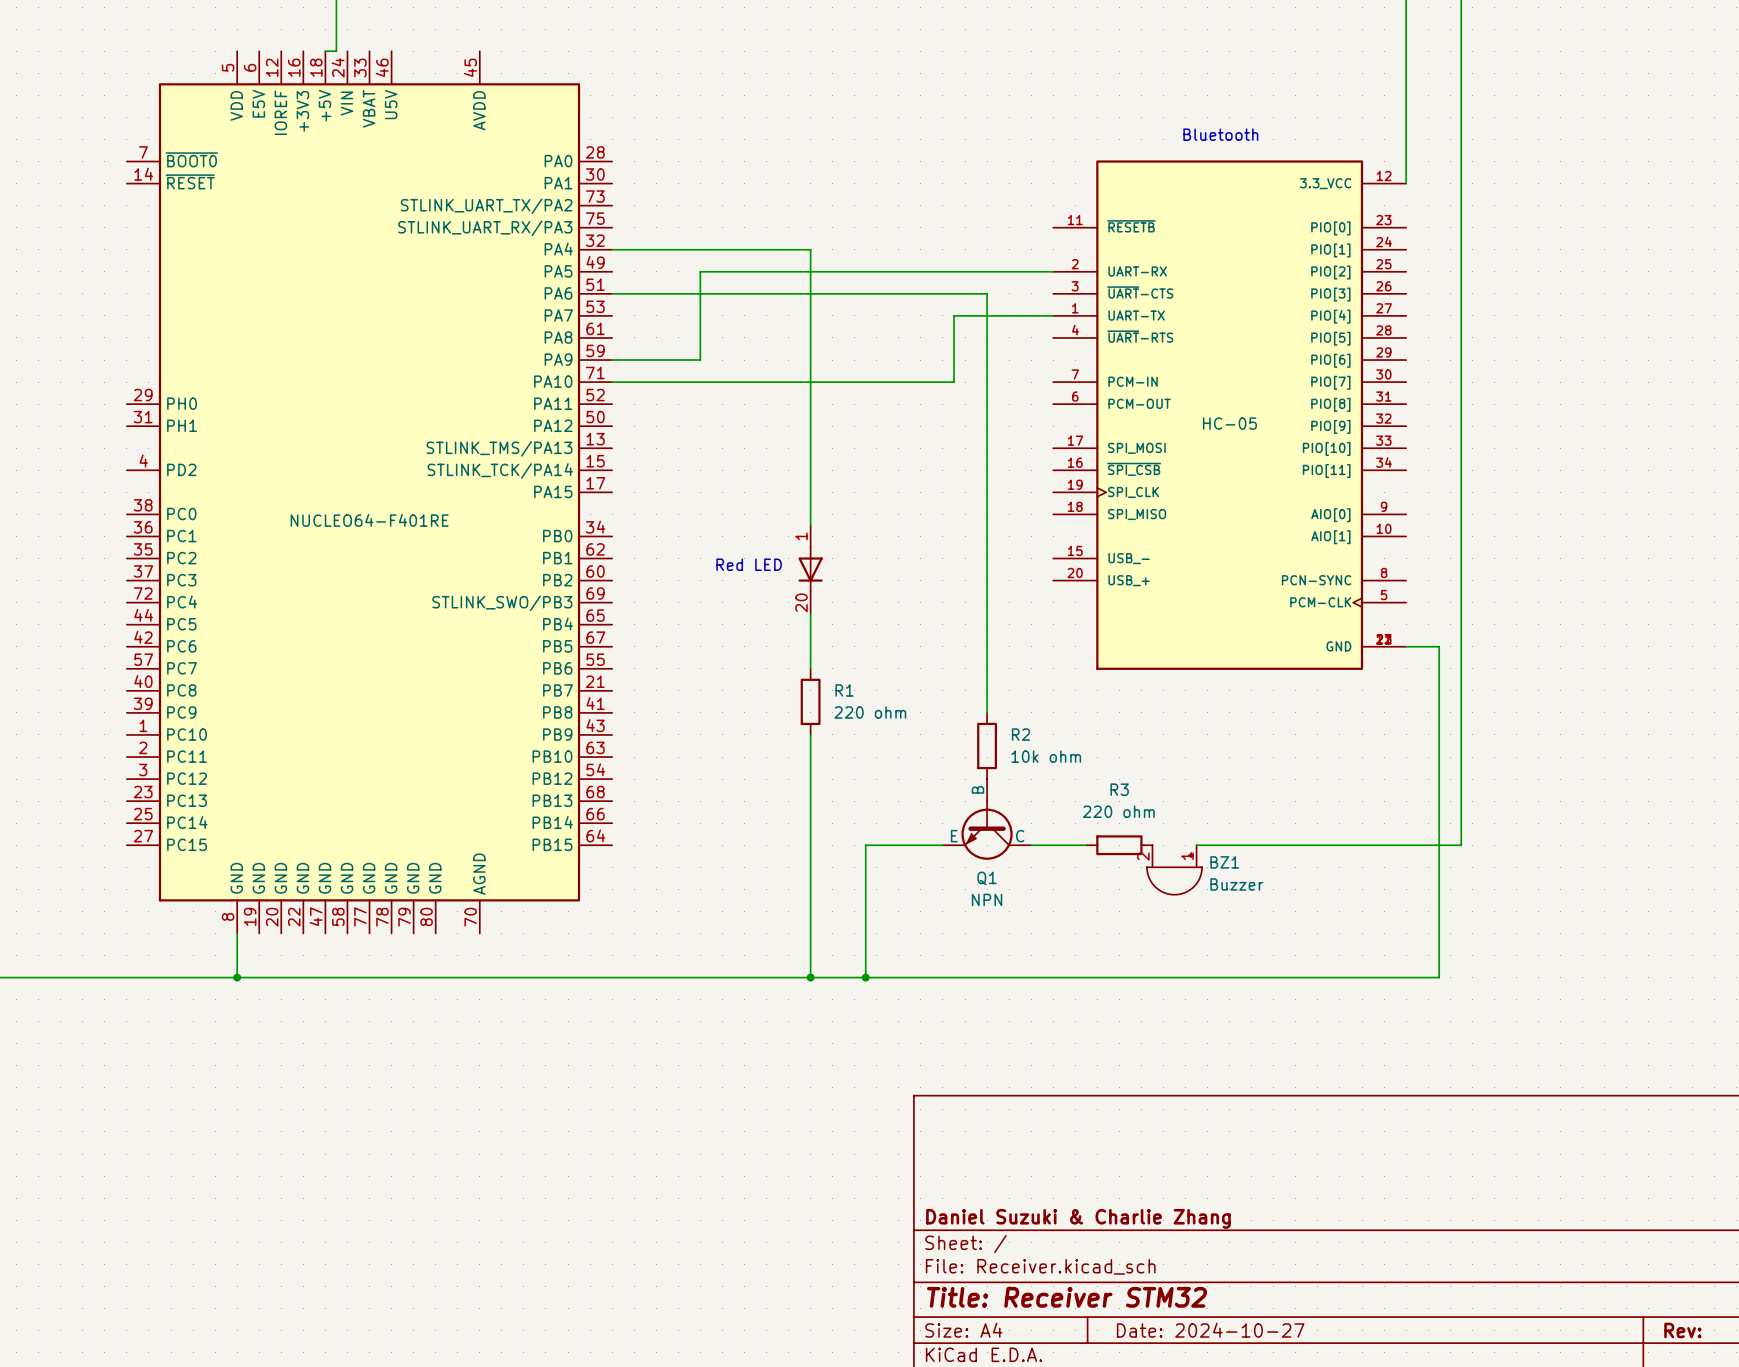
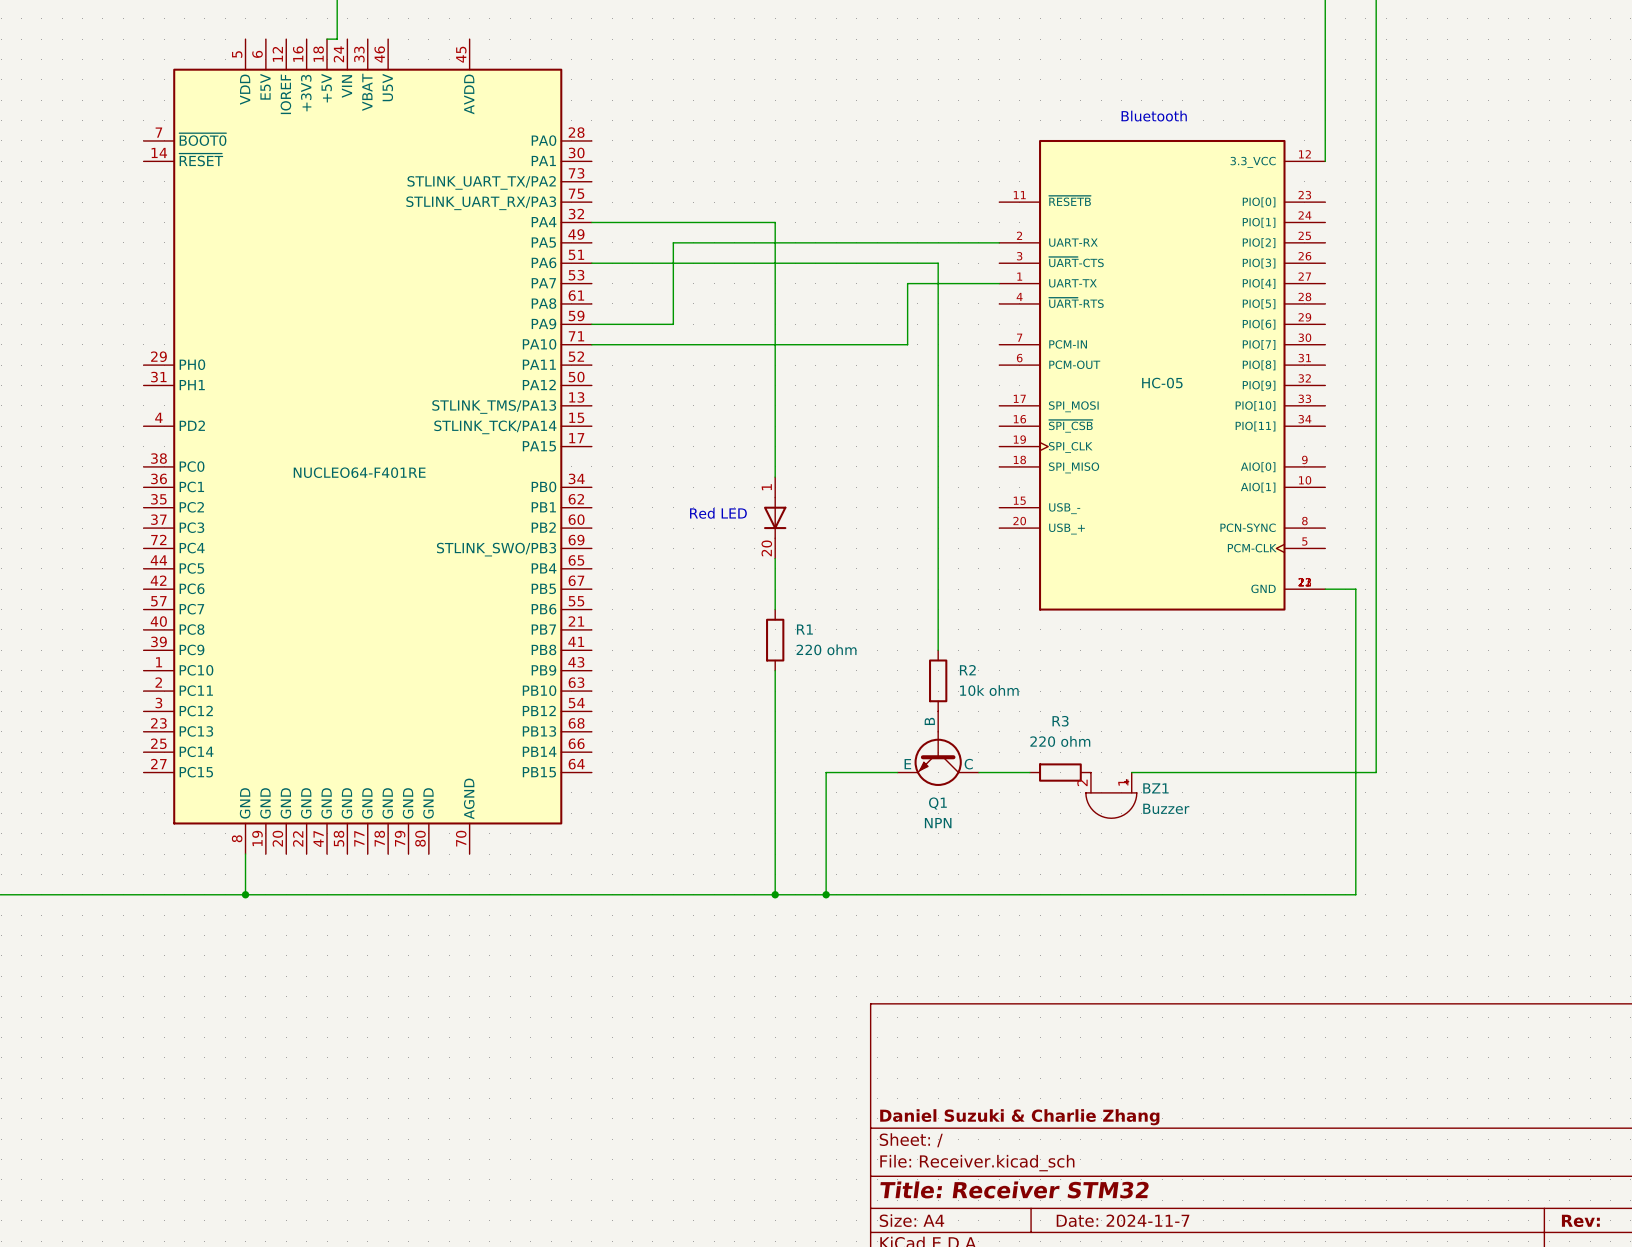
title block: Date: 2024-10-27 (1210, 1330) -> Date: 2024-11-7 (1123, 1220)

